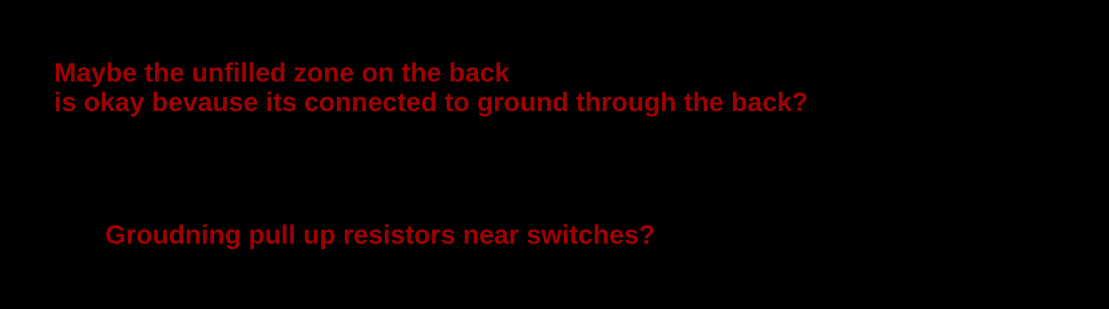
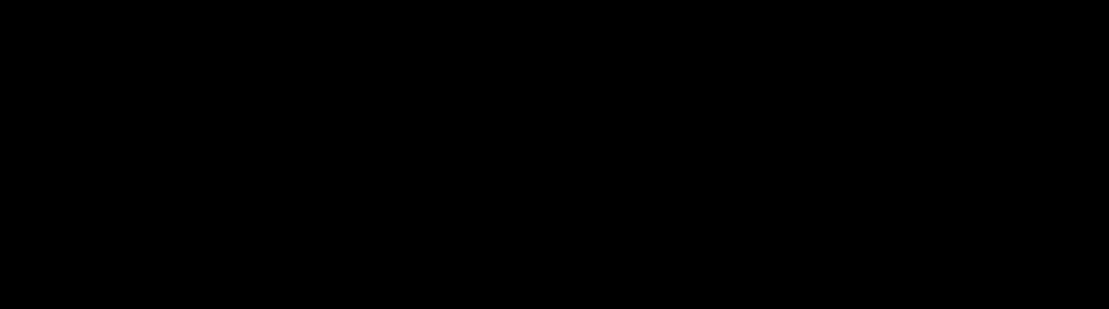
text: Maybe the unfilled zone on the back (282, 74) -> none
text: is okay bevause its connected to ground through the back? (431, 104) -> none
text: Groudning pull up resistors near switches? (379, 236) -> none

